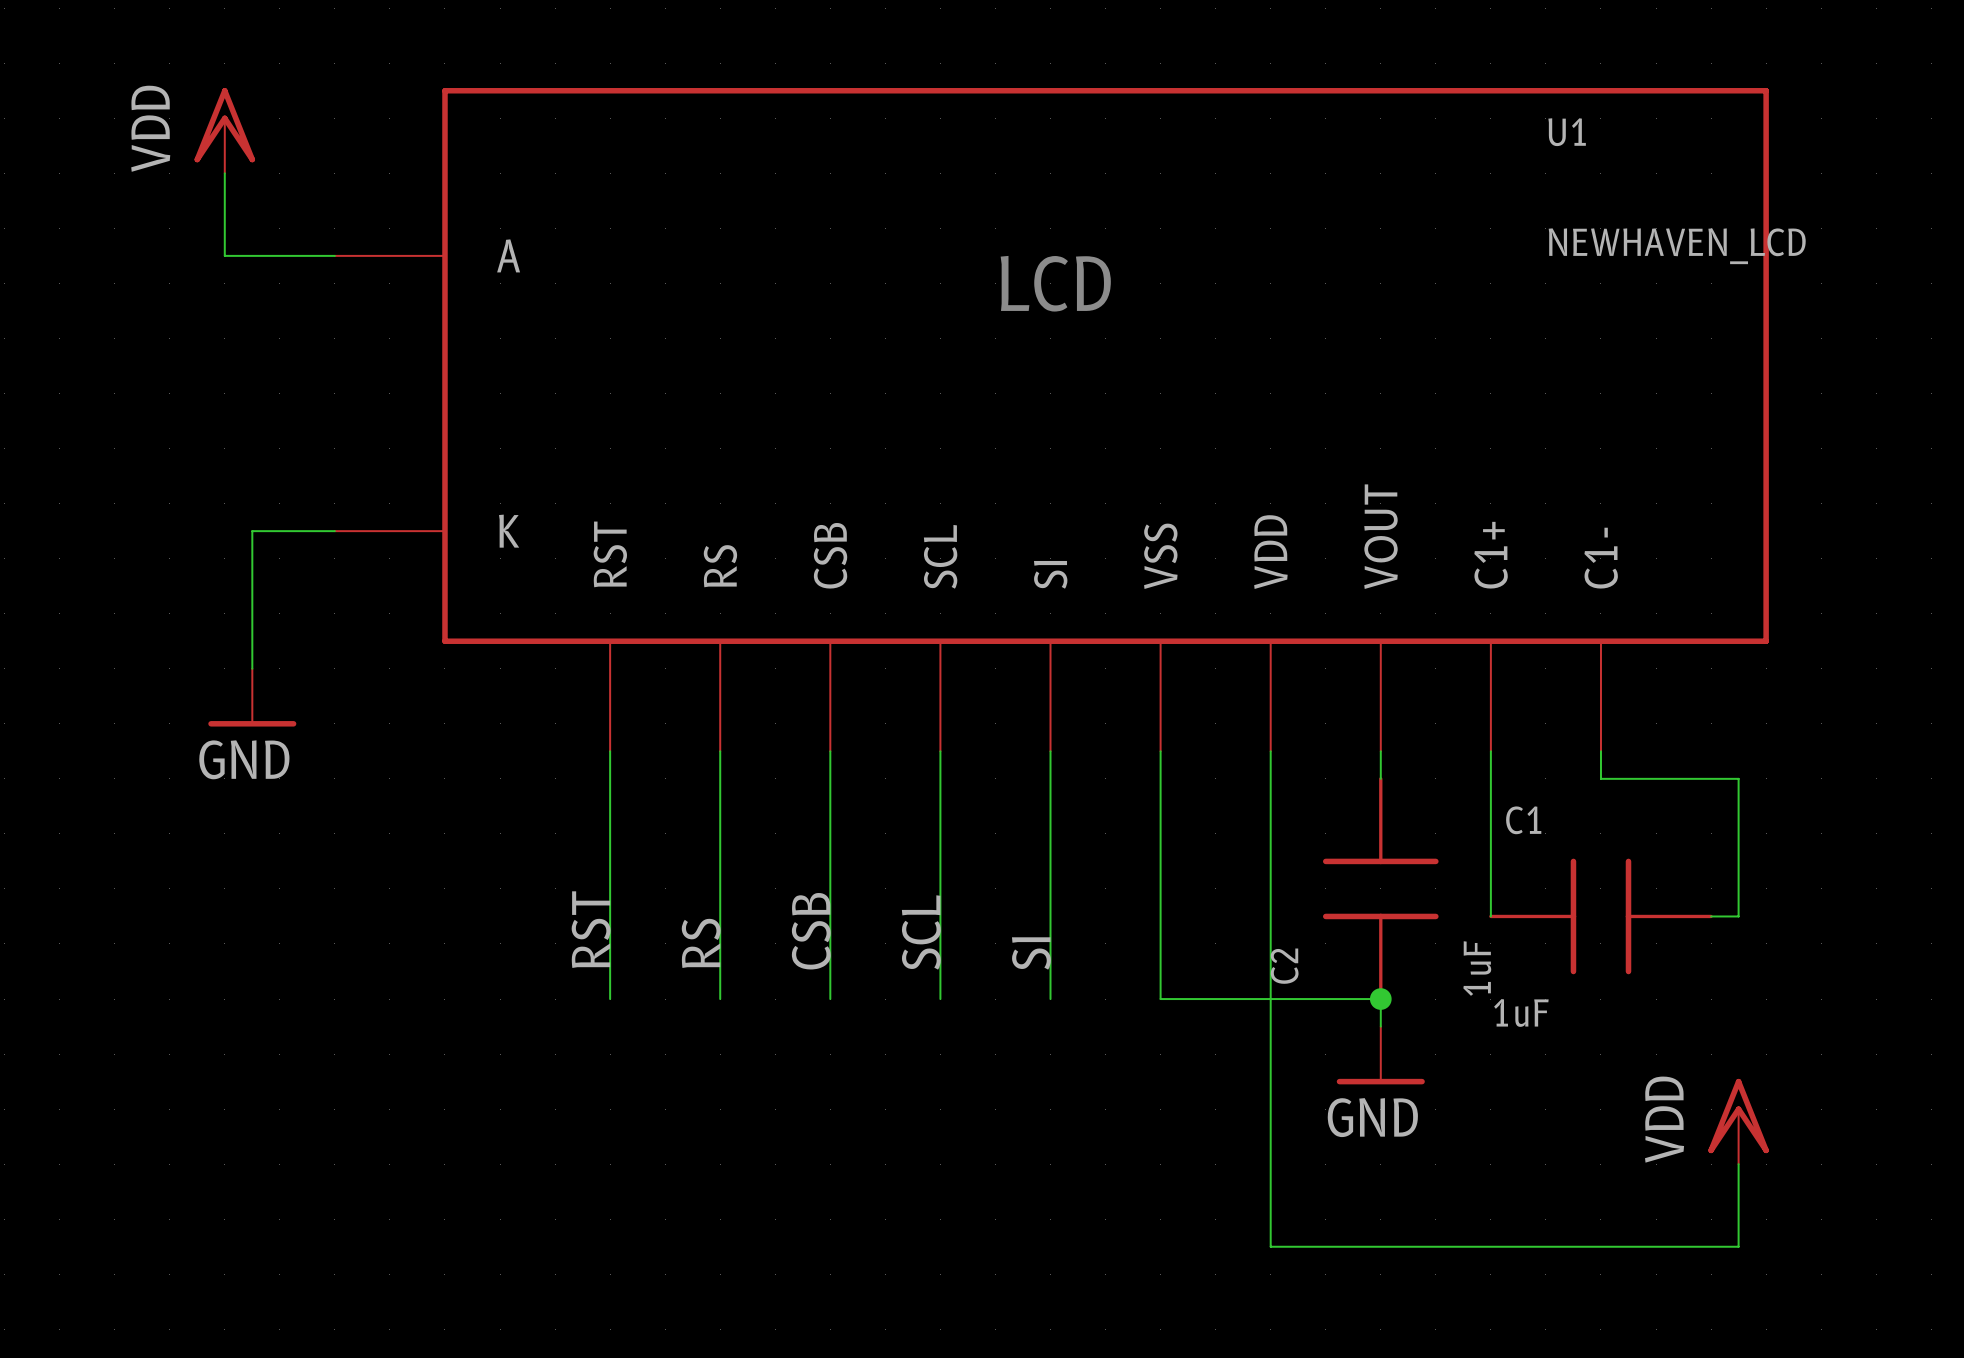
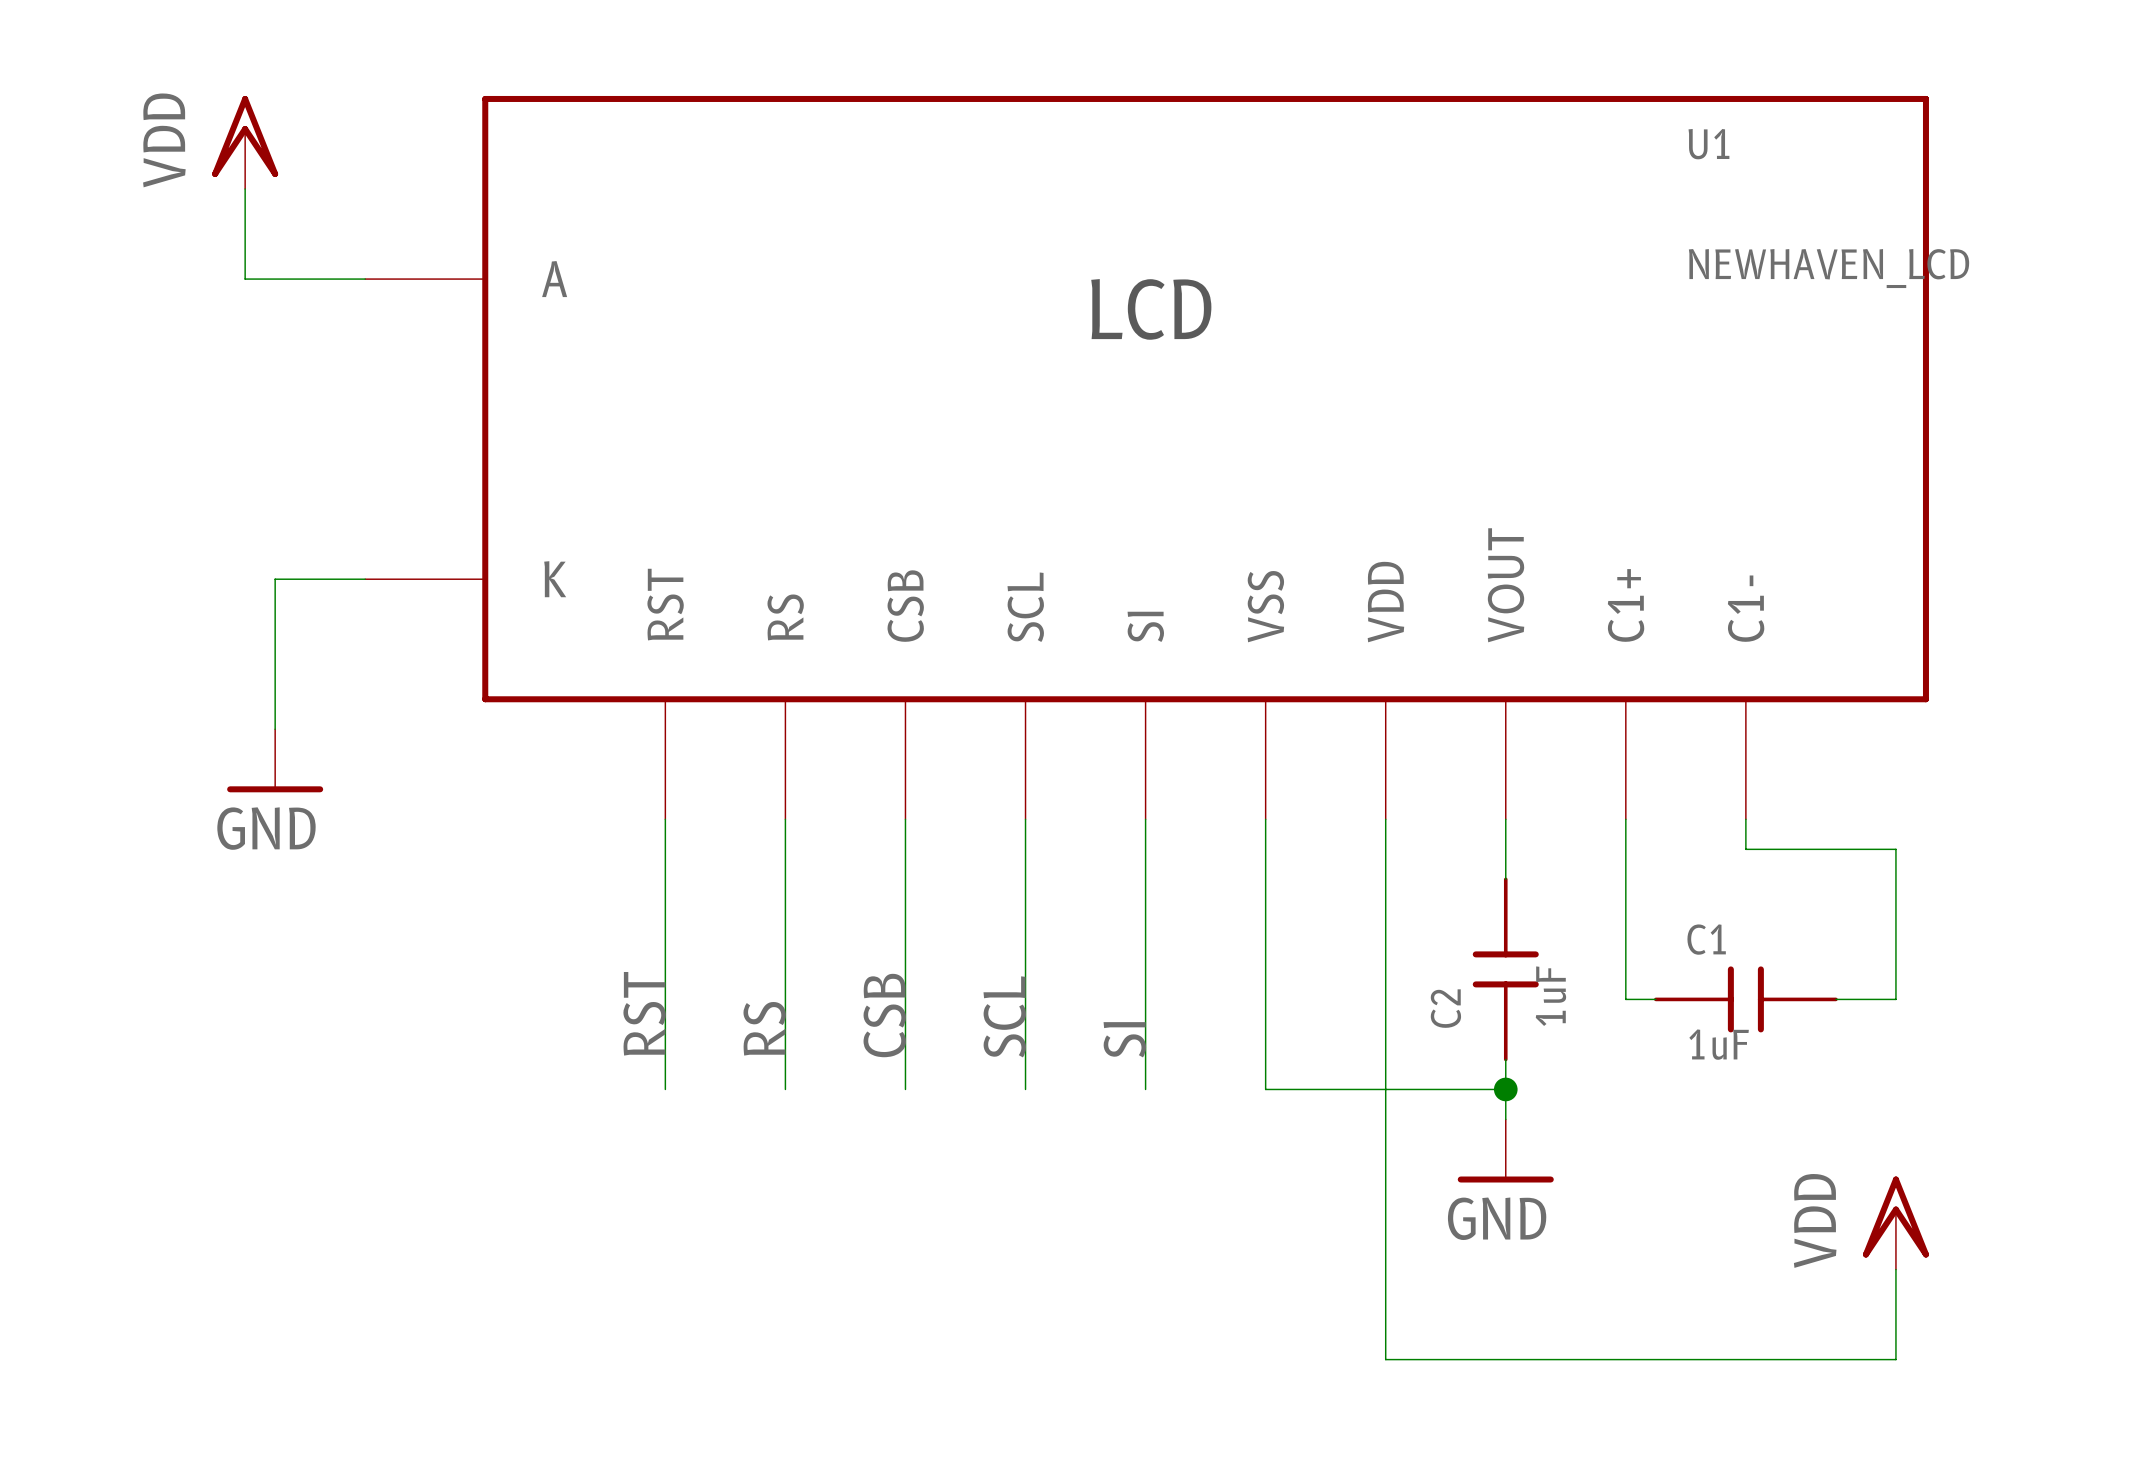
C2 symbol: [1322, 777, 1439, 1001] -> [1472, 877, 1539, 1062]
C1 name position: C1 (1523, 820) -> C1 (1706, 939)
C1 symbol: [1489, 858, 1713, 975] -> [1654, 966, 1838, 1033]
C2 name position: C2 (1284, 966) -> C2 (1445, 1008)
C2 value position: 1uF (1477, 968) -> 1uF (1550, 996)
C1 value position: 1uF (1521, 1012) -> 1uF (1719, 1044)

